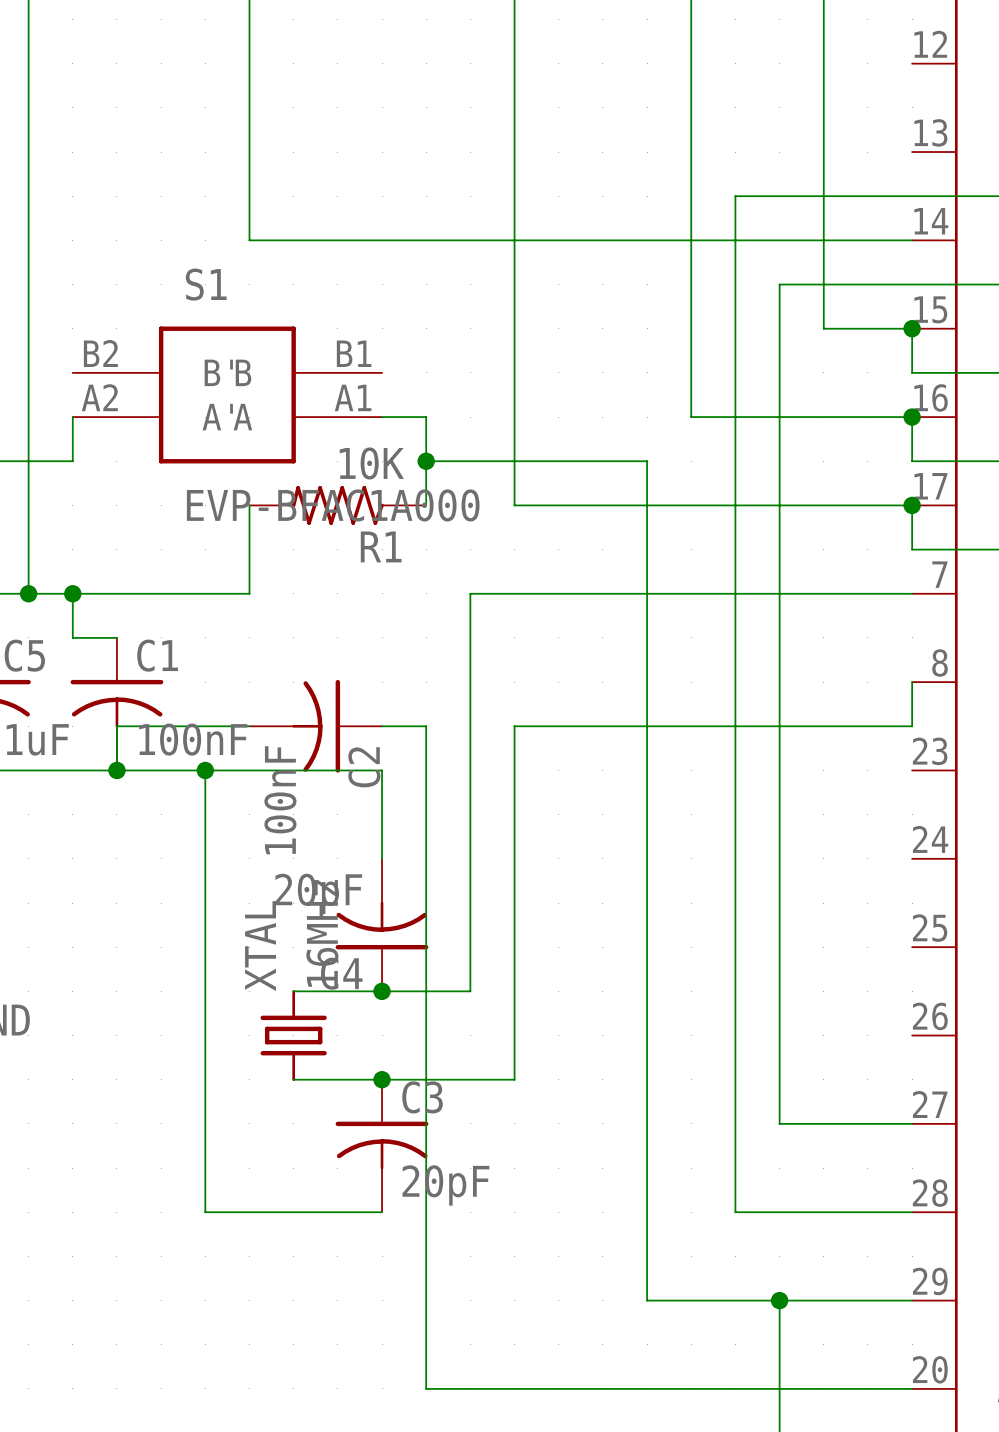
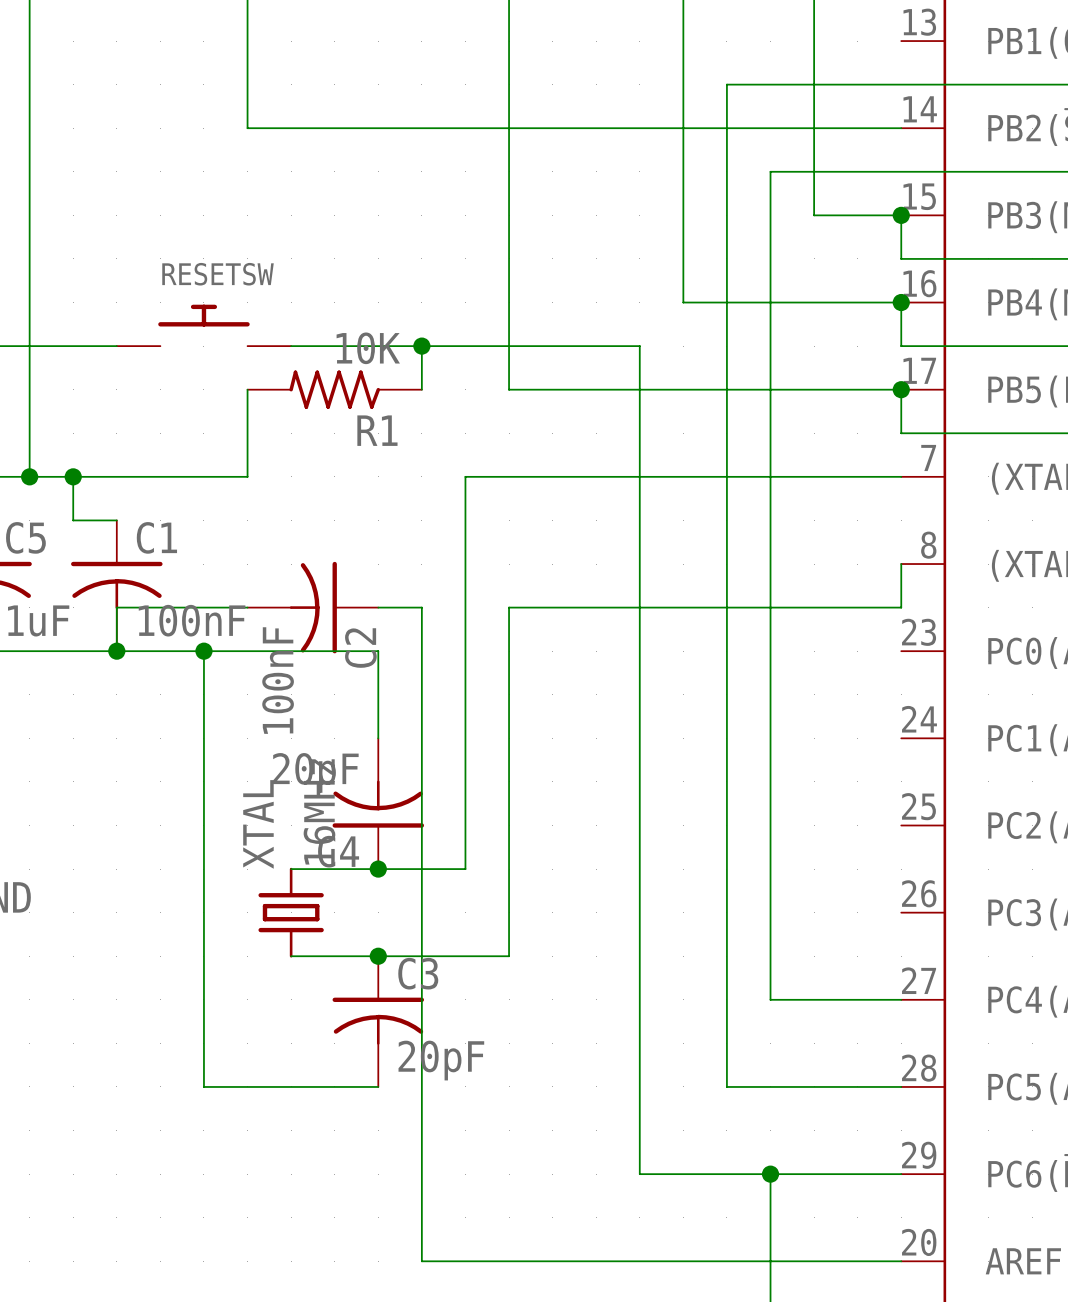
S1: EVP-BFAC1A000 (227, 394) -> none
wire: (72, 417) (72, 461) -> (116, 346) (73, 346)
wire: (382, 417) (426, 417) (426, 461) -> (291, 346) (421, 346)
RESETSW: none -> (203, 325)

